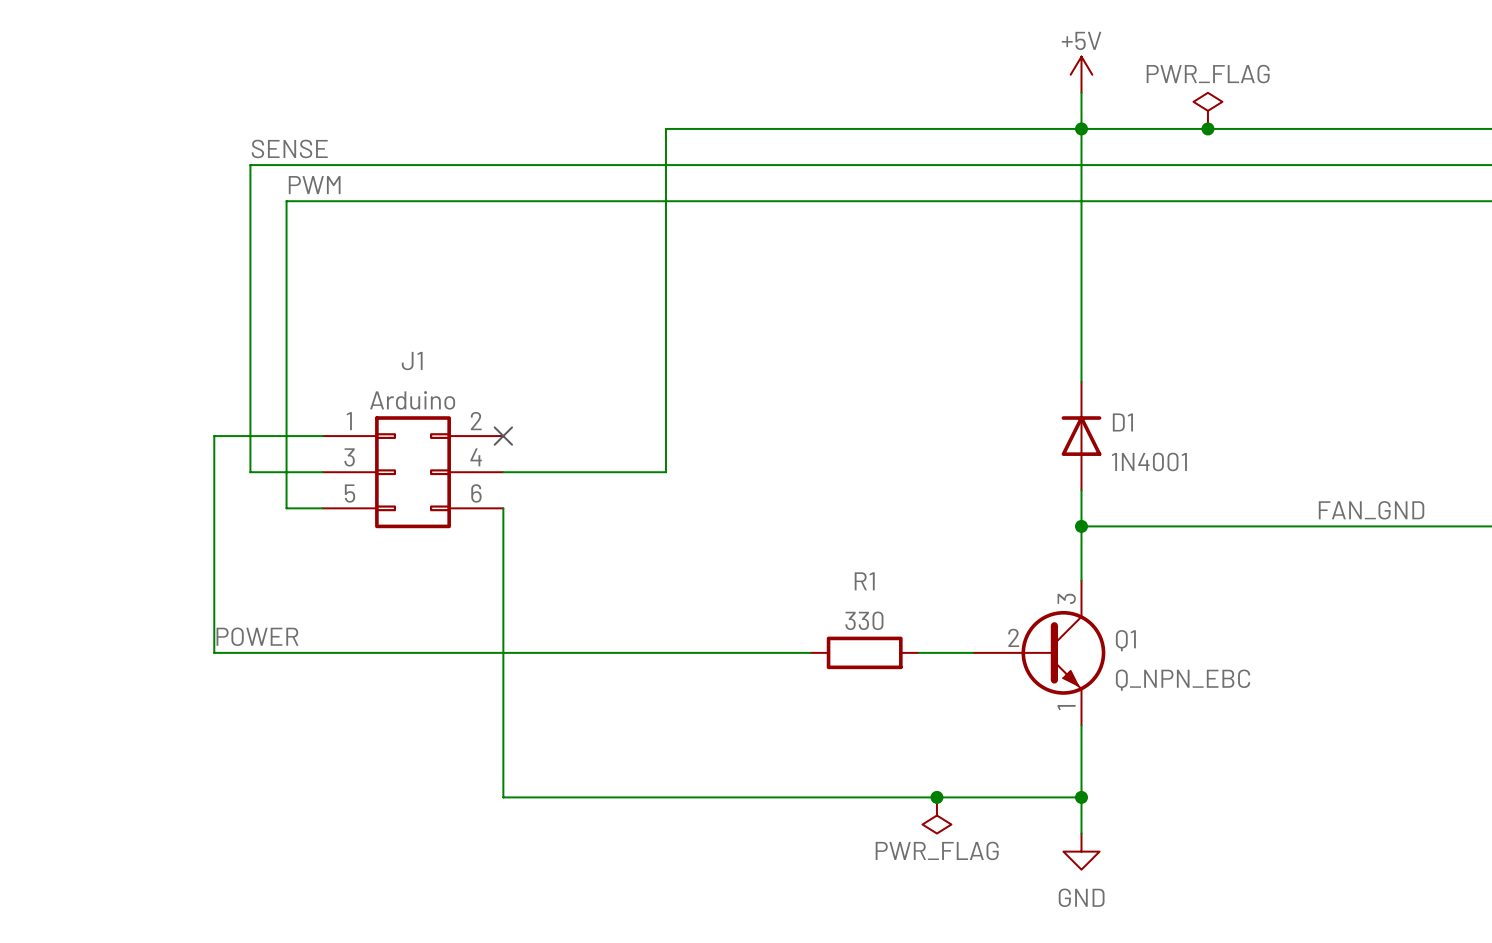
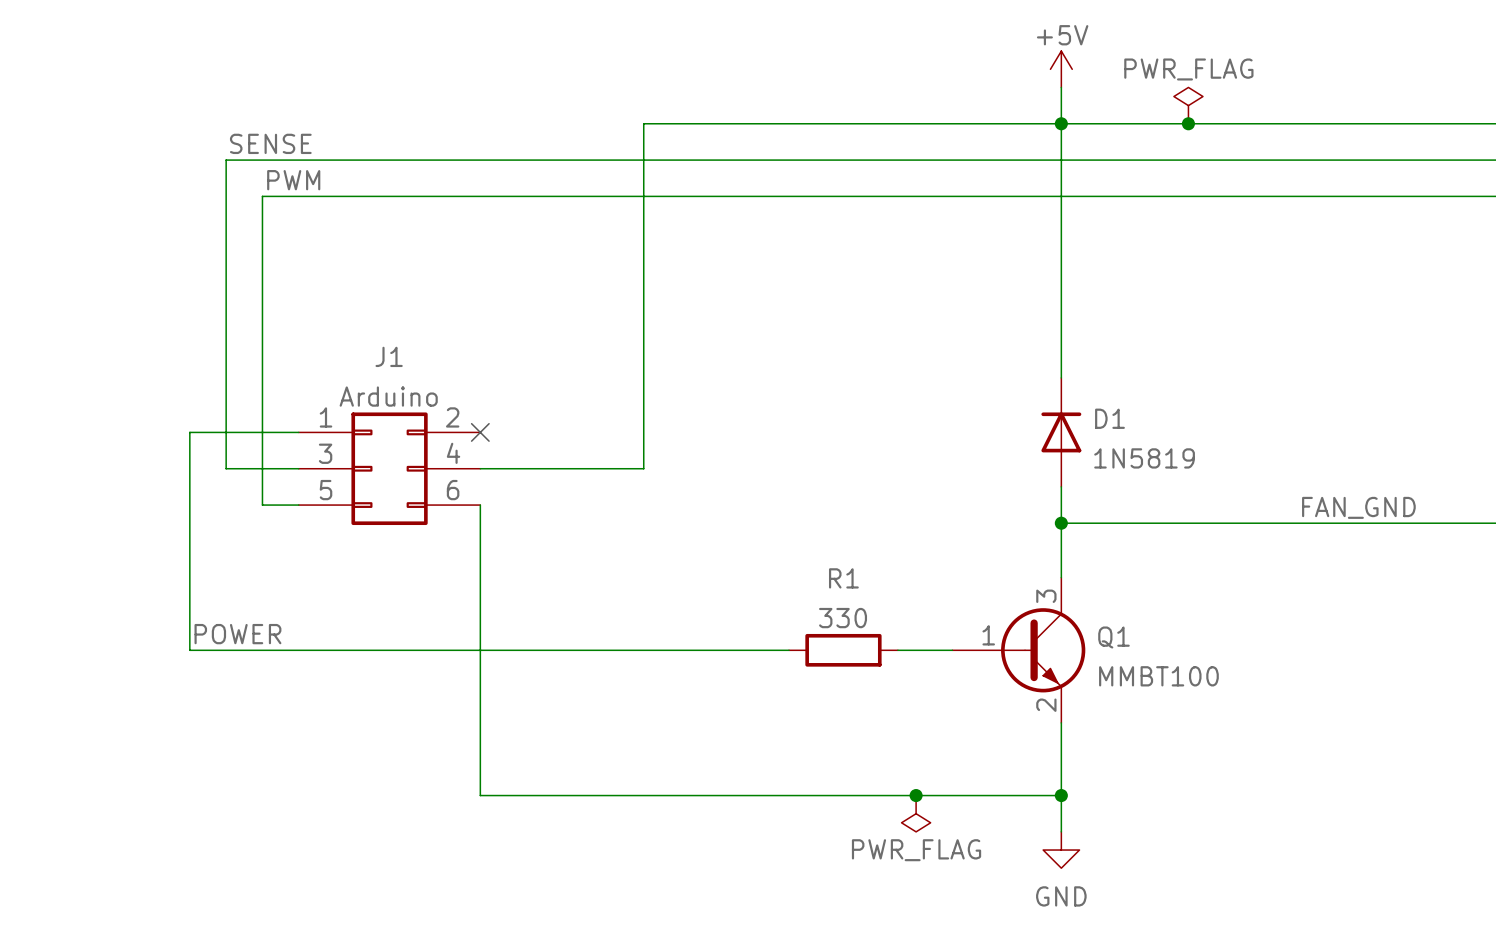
D1 value: 1N4001 (1149, 461) -> 1N5819 (1144, 458)
Q1 symbol: [973, 580, 1106, 726] -> [952, 577, 1086, 723]
Q1 value: Q_NPN_EBC (1183, 680) -> MMBT100 (1158, 676)

